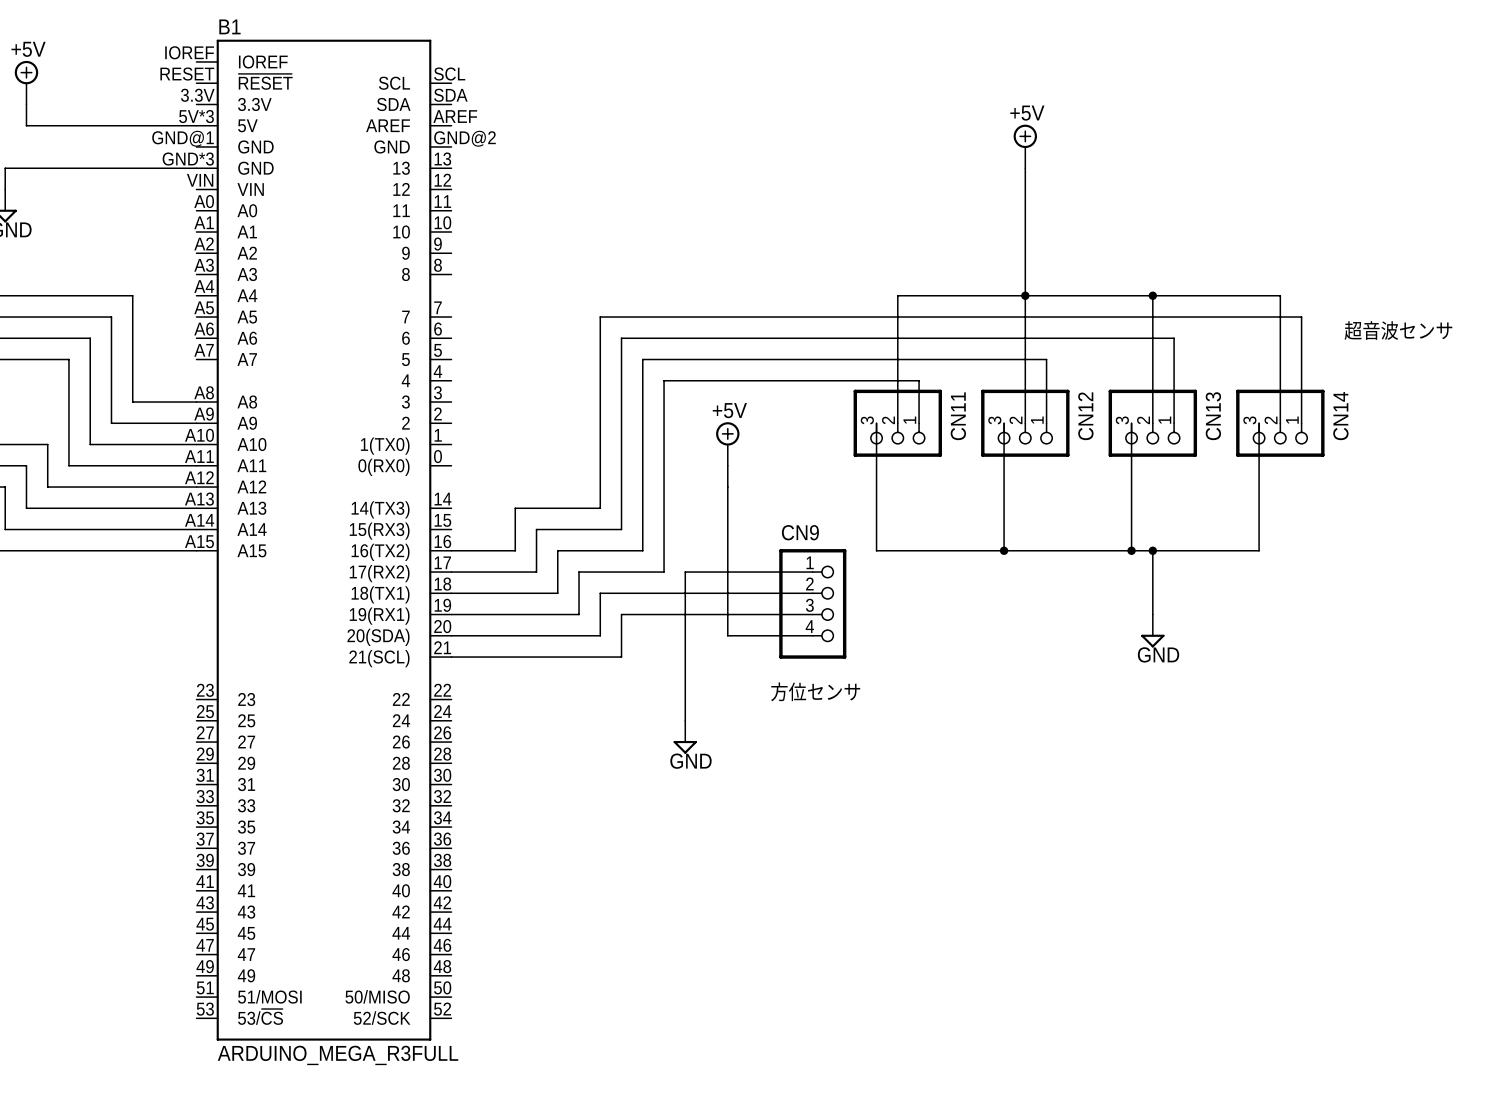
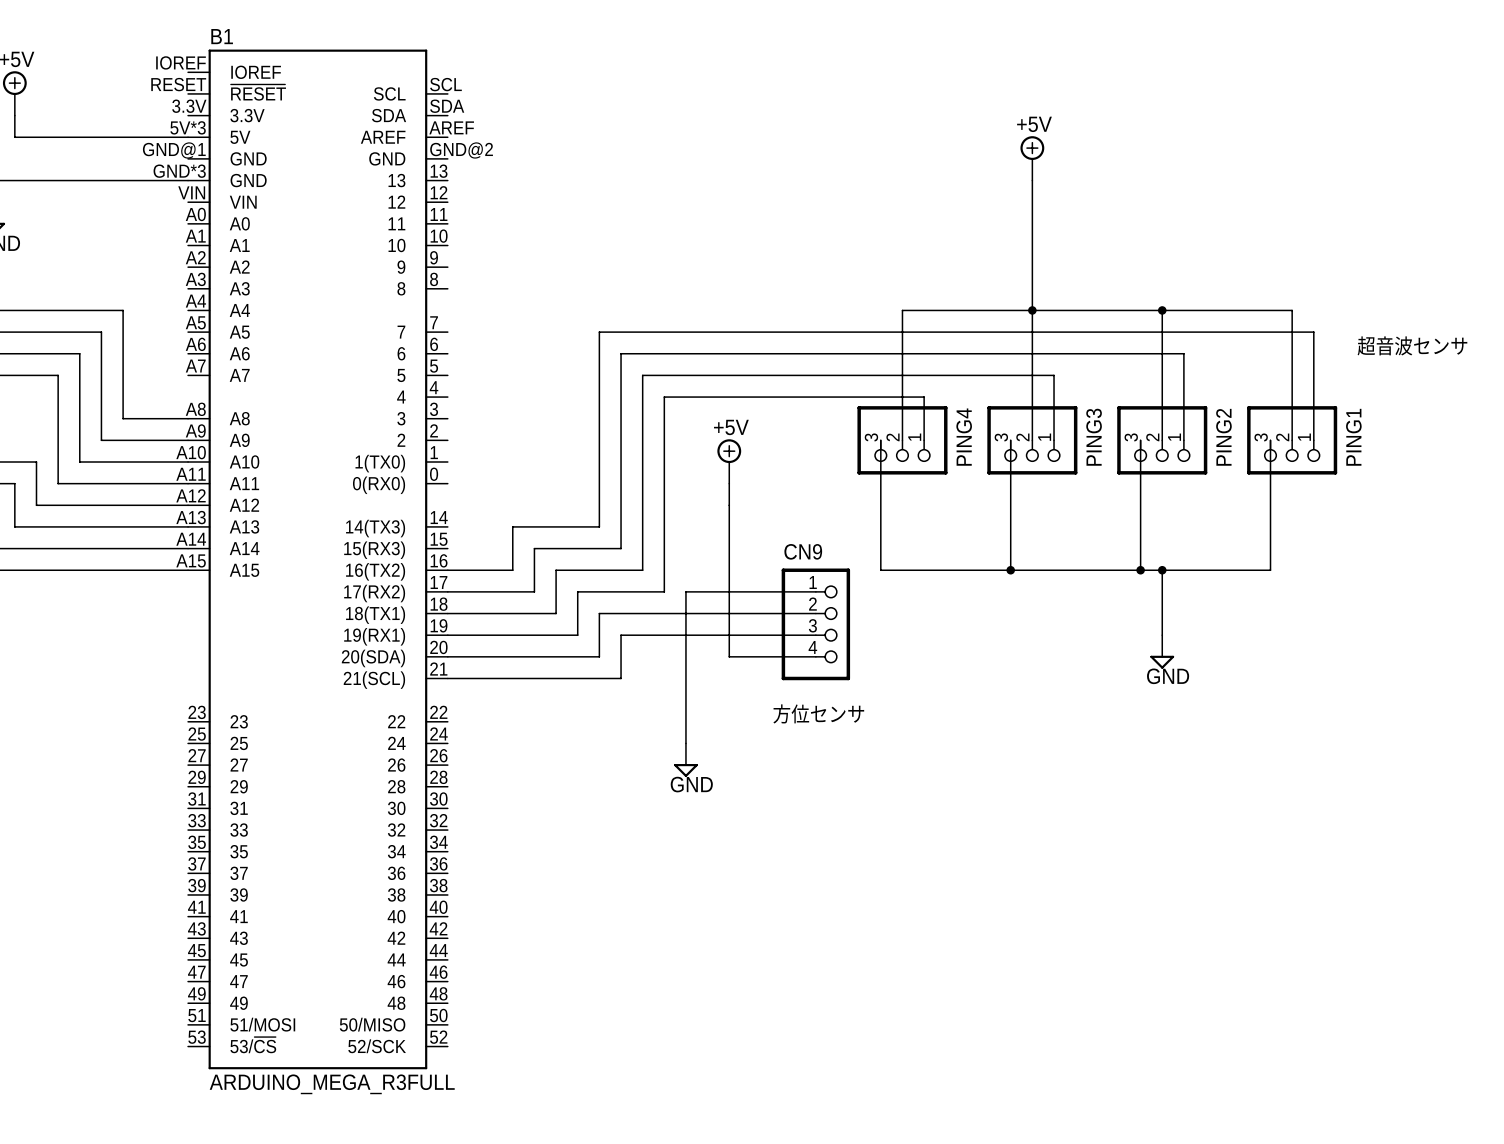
CN11 name: CN11 (958, 416) -> PING4 (964, 437)
CN12 name: CN12 (1085, 416) -> PING3 (1094, 437)
CN13 name: CN13 (1213, 416) -> PING2 (1223, 437)
CN14 name: CN14 (1340, 416) -> PING1 (1353, 437)

